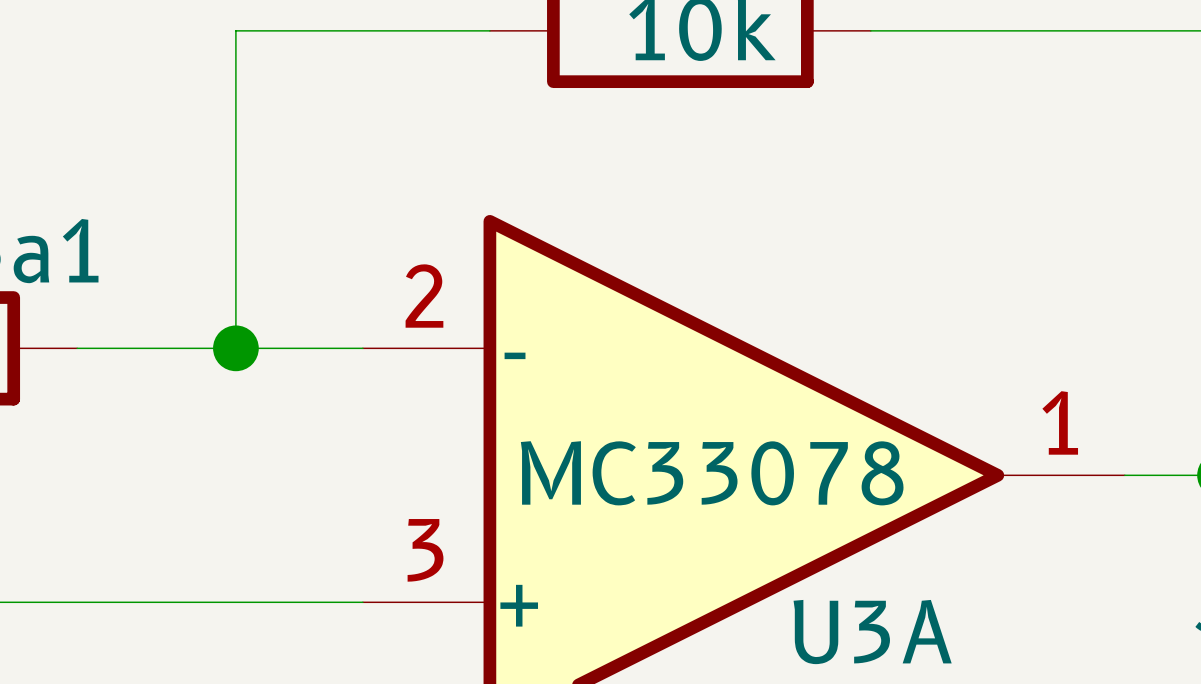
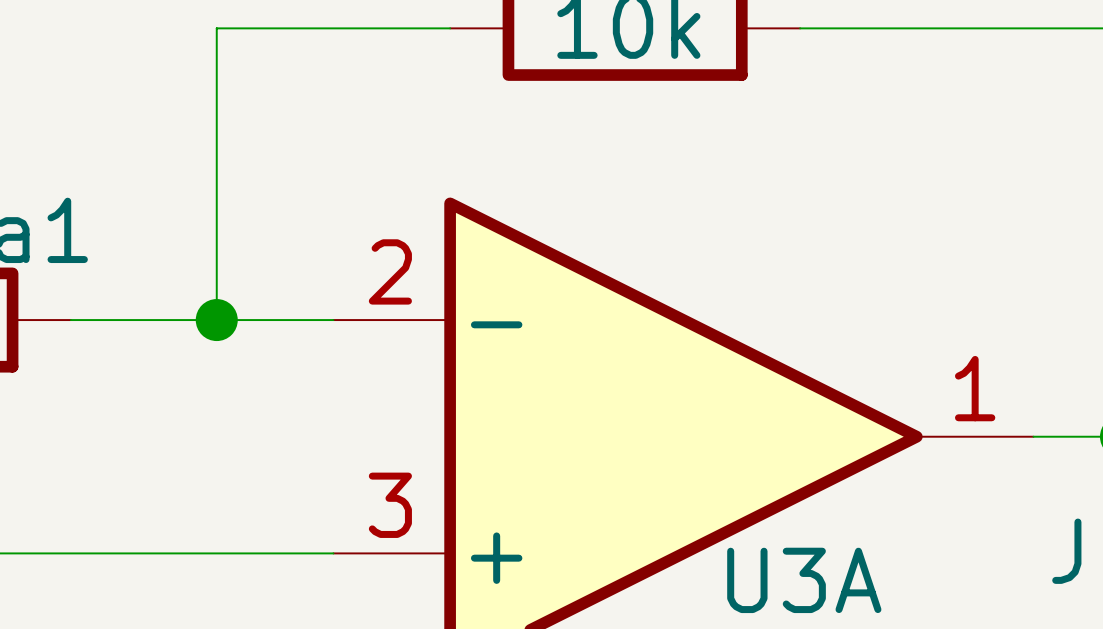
U3A value: MC33078 (712, 473) -> none

